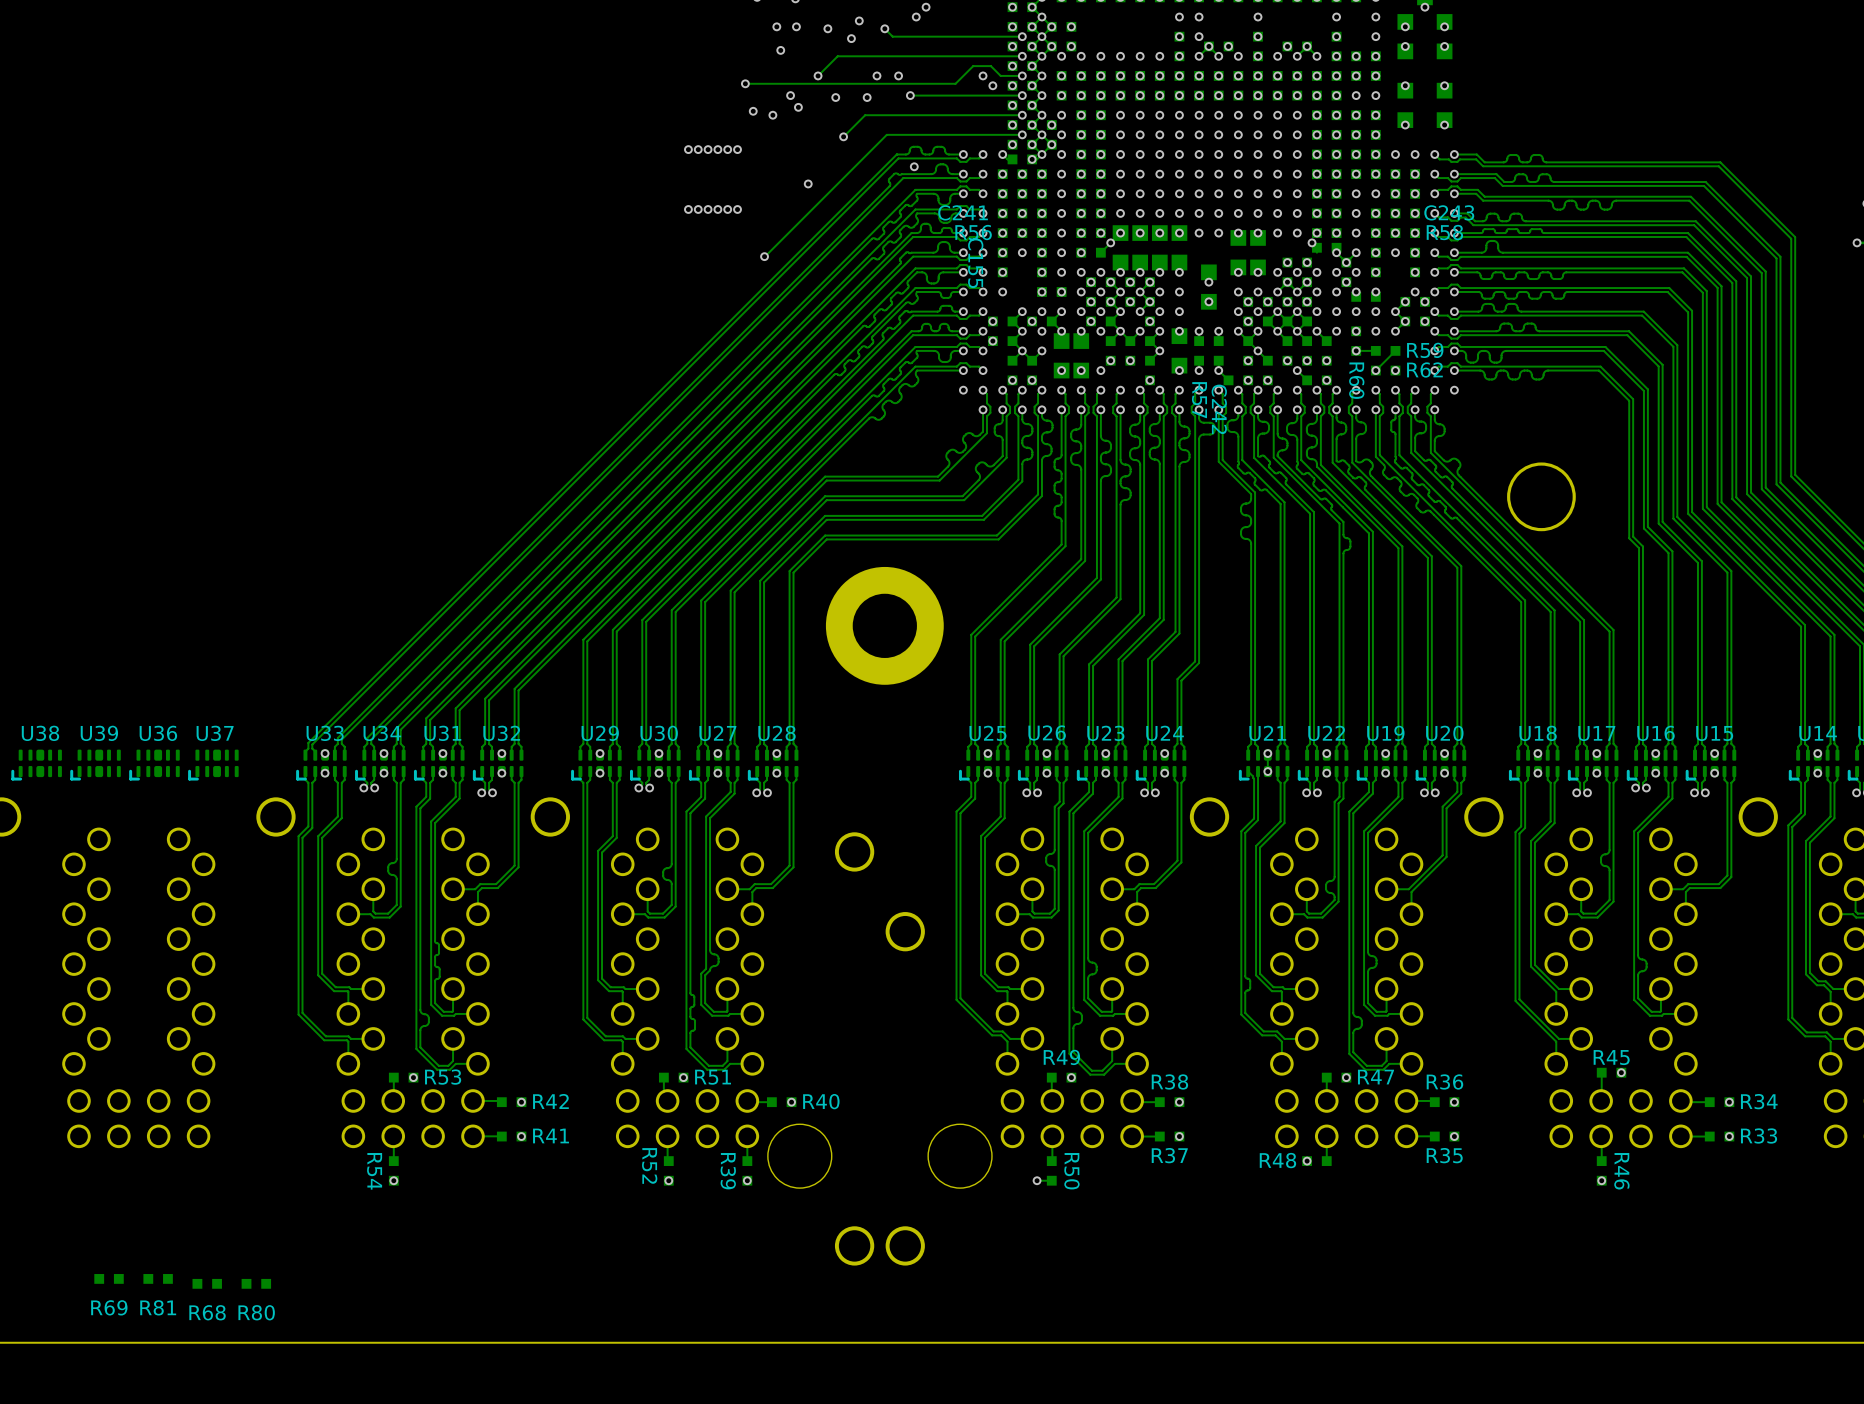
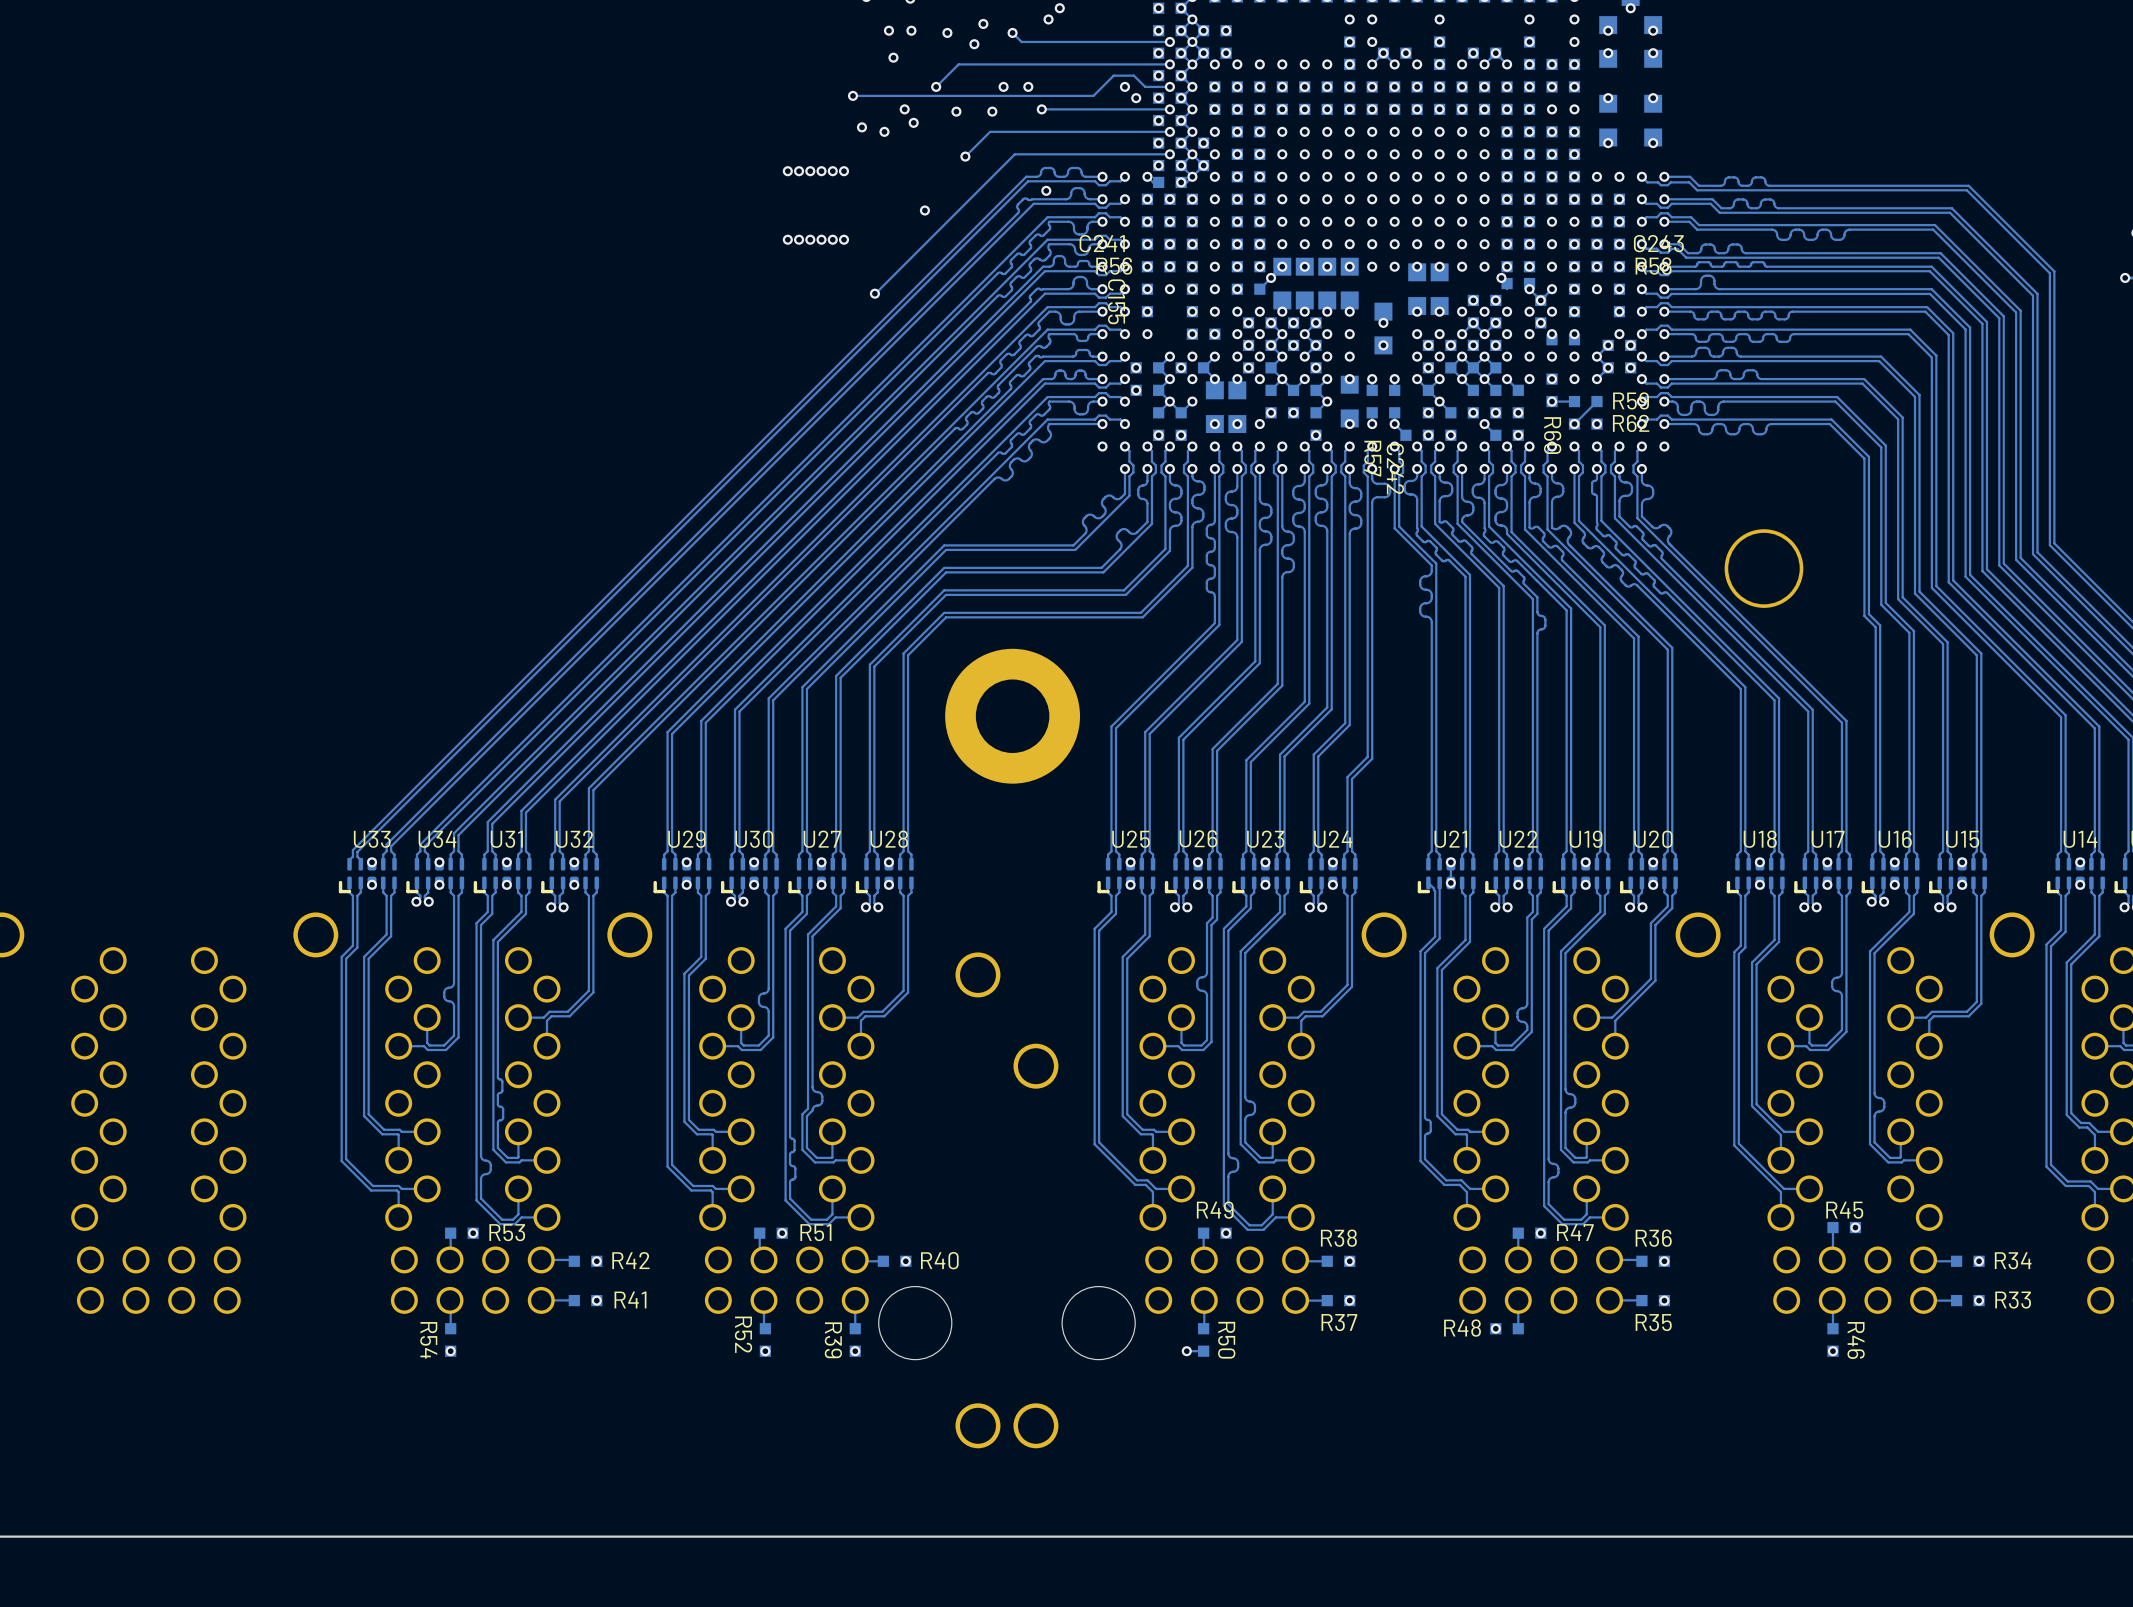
U38: (36, 765) -> none
U39: (95, 765) -> none
U36: (154, 765) -> none
U37: (213, 765) -> none
R69: (109, 1278) -> none
R81: (158, 1278) -> none
R68: (207, 1283) -> none
R80: (256, 1283) -> none

